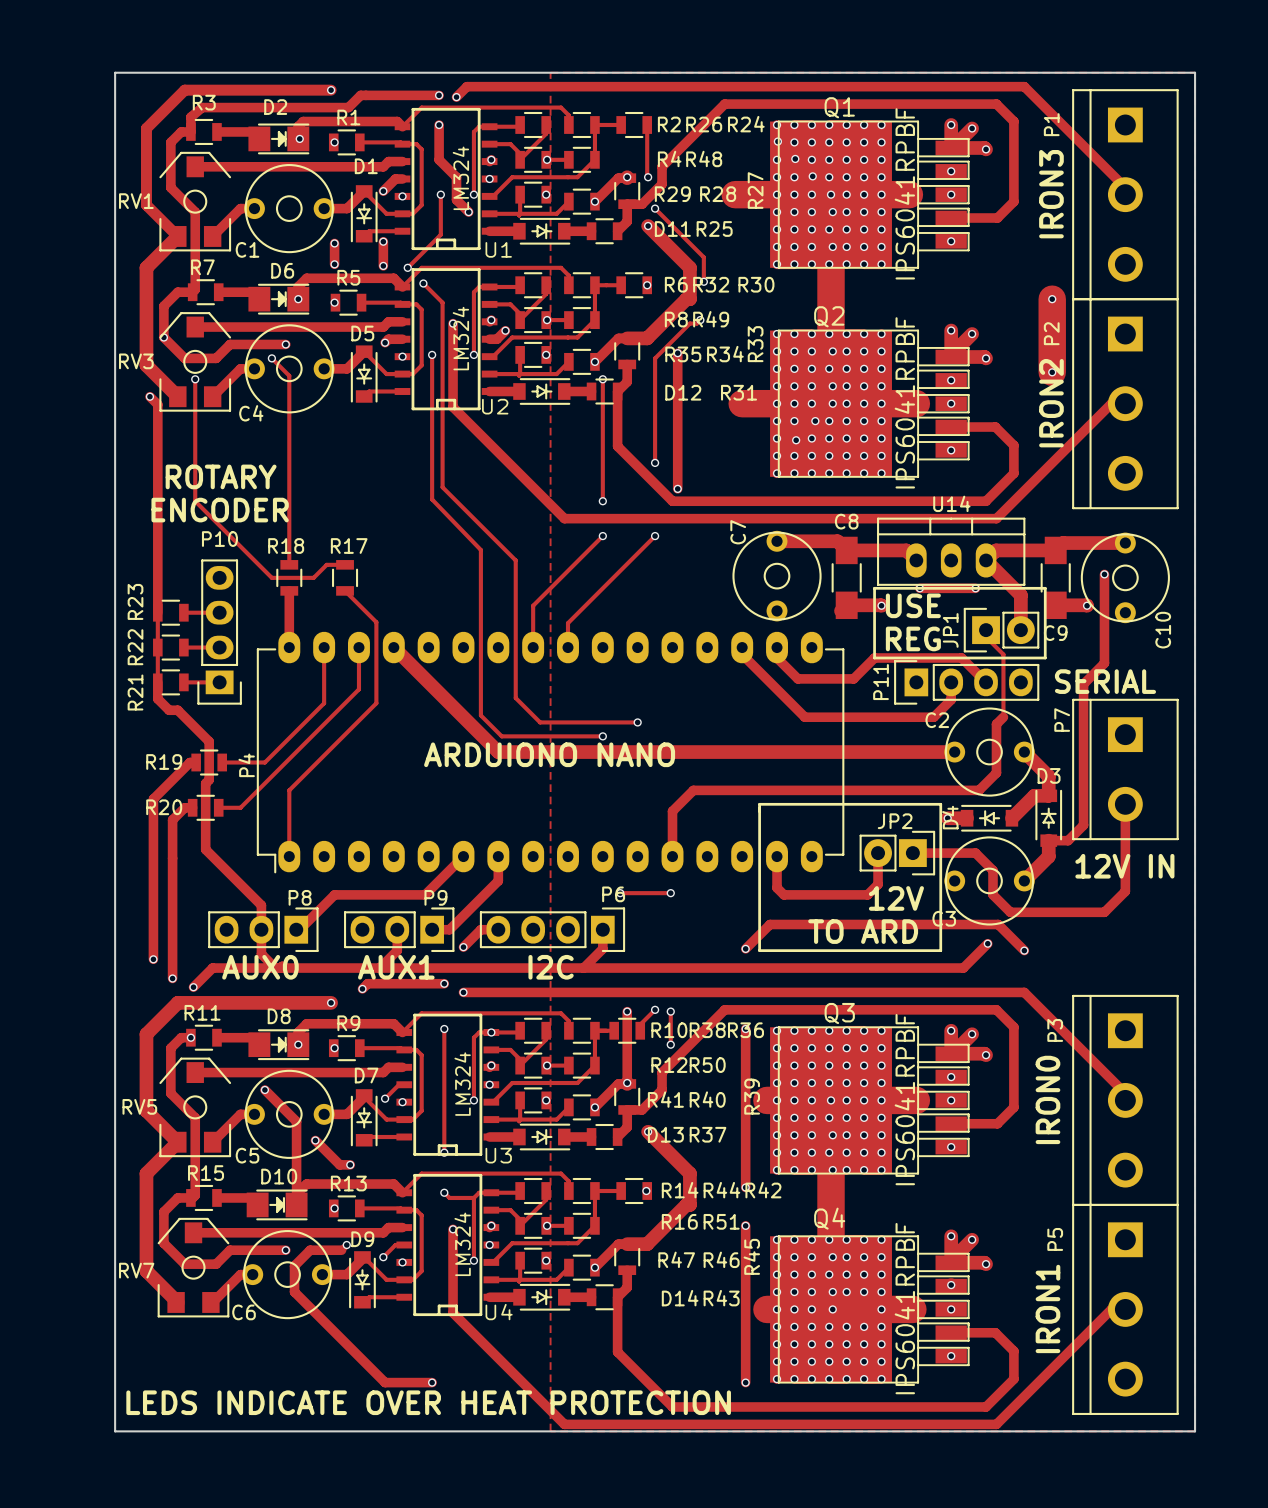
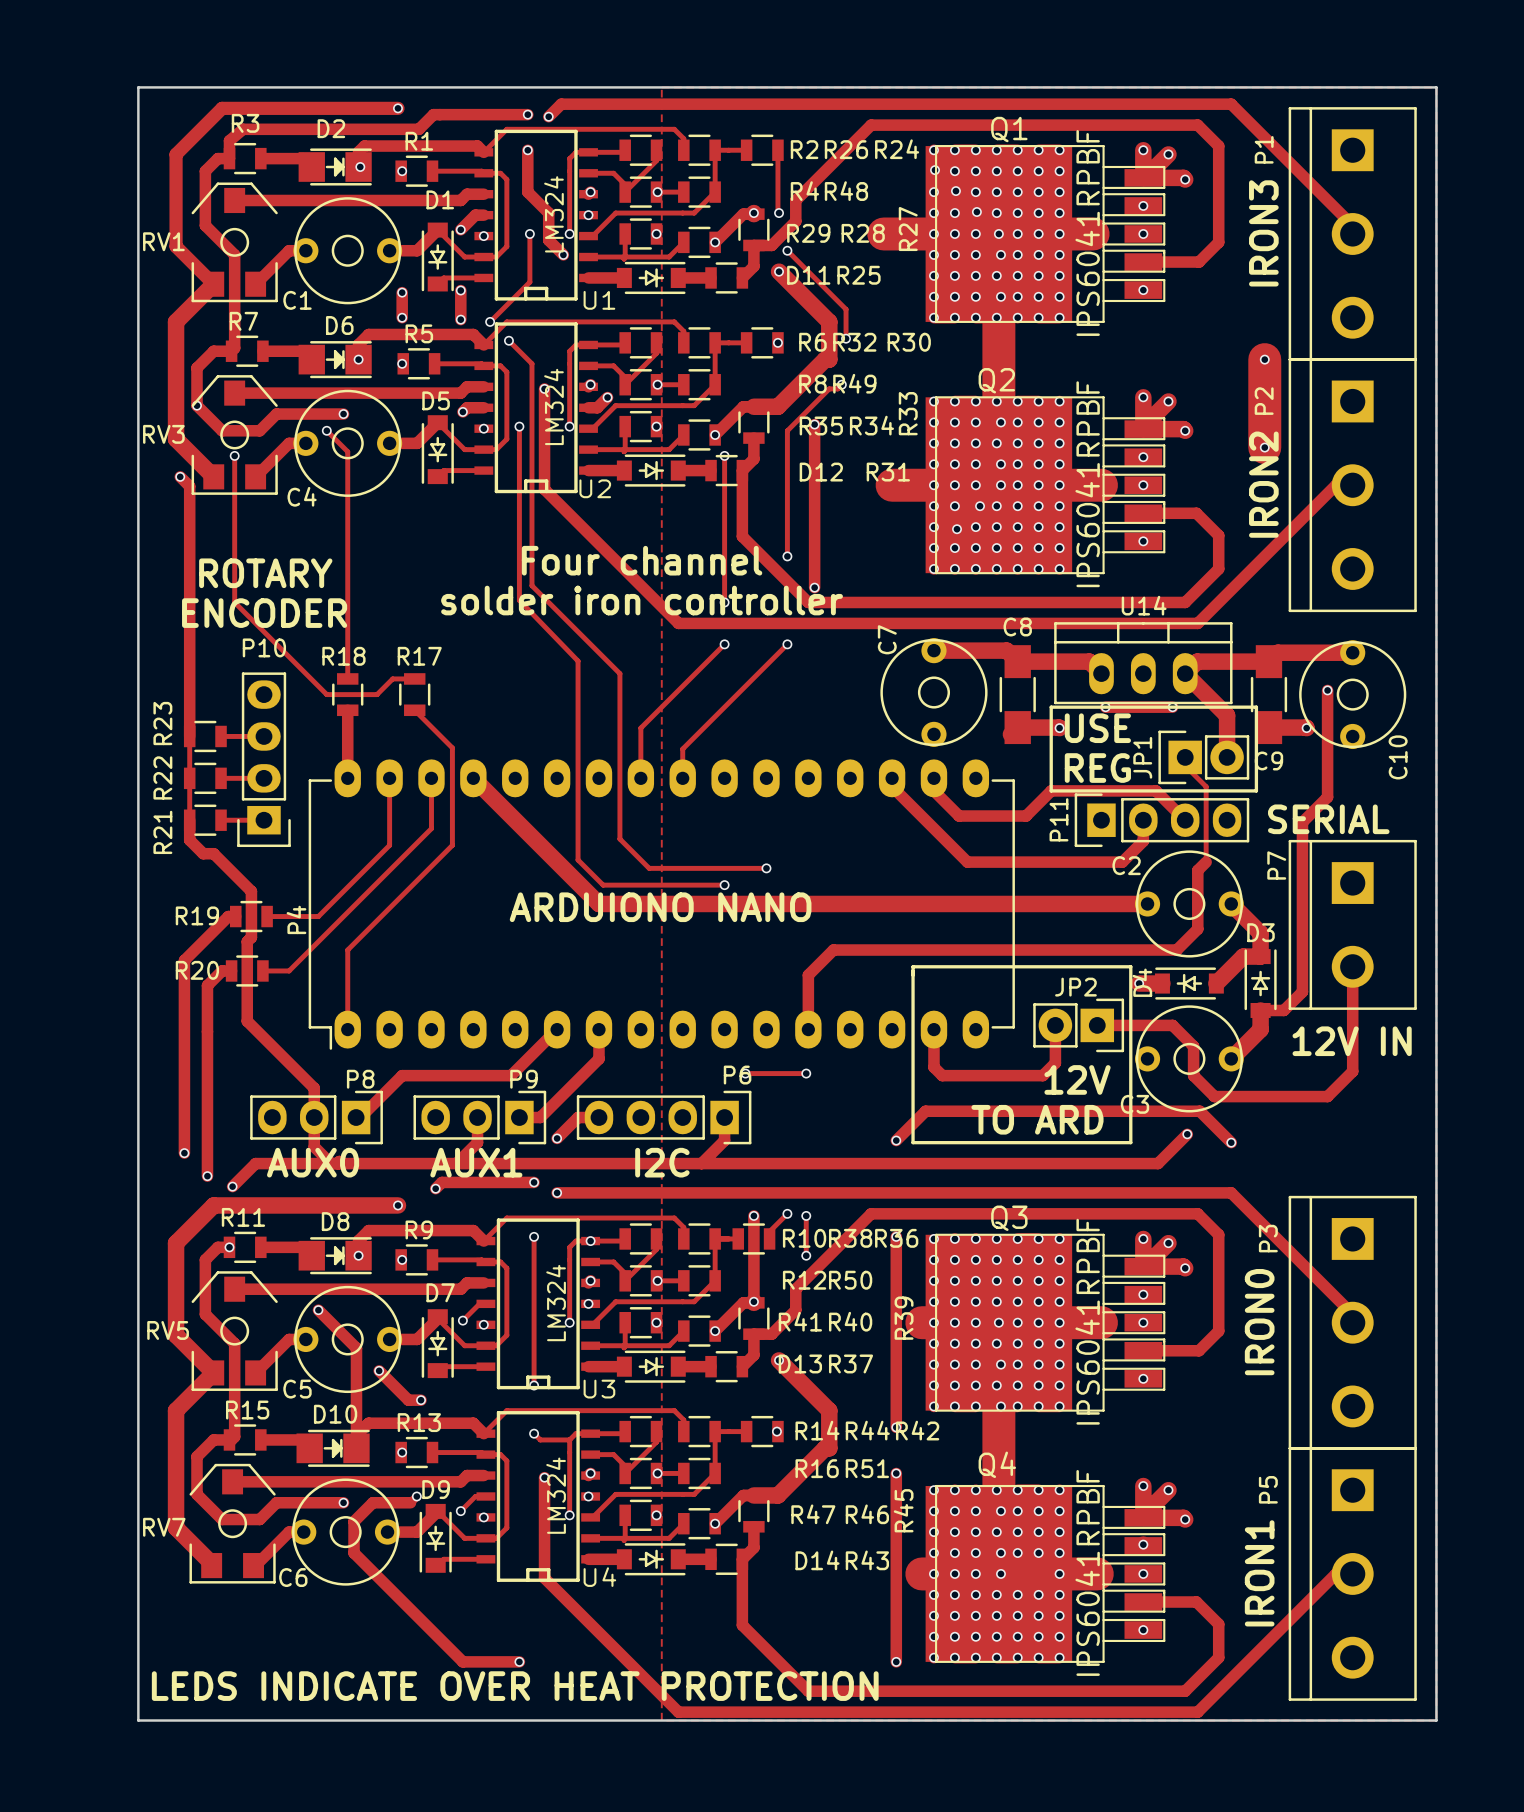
text: none -> Four channel (642, 560)
text: none -> solder iron controller (642, 600)

